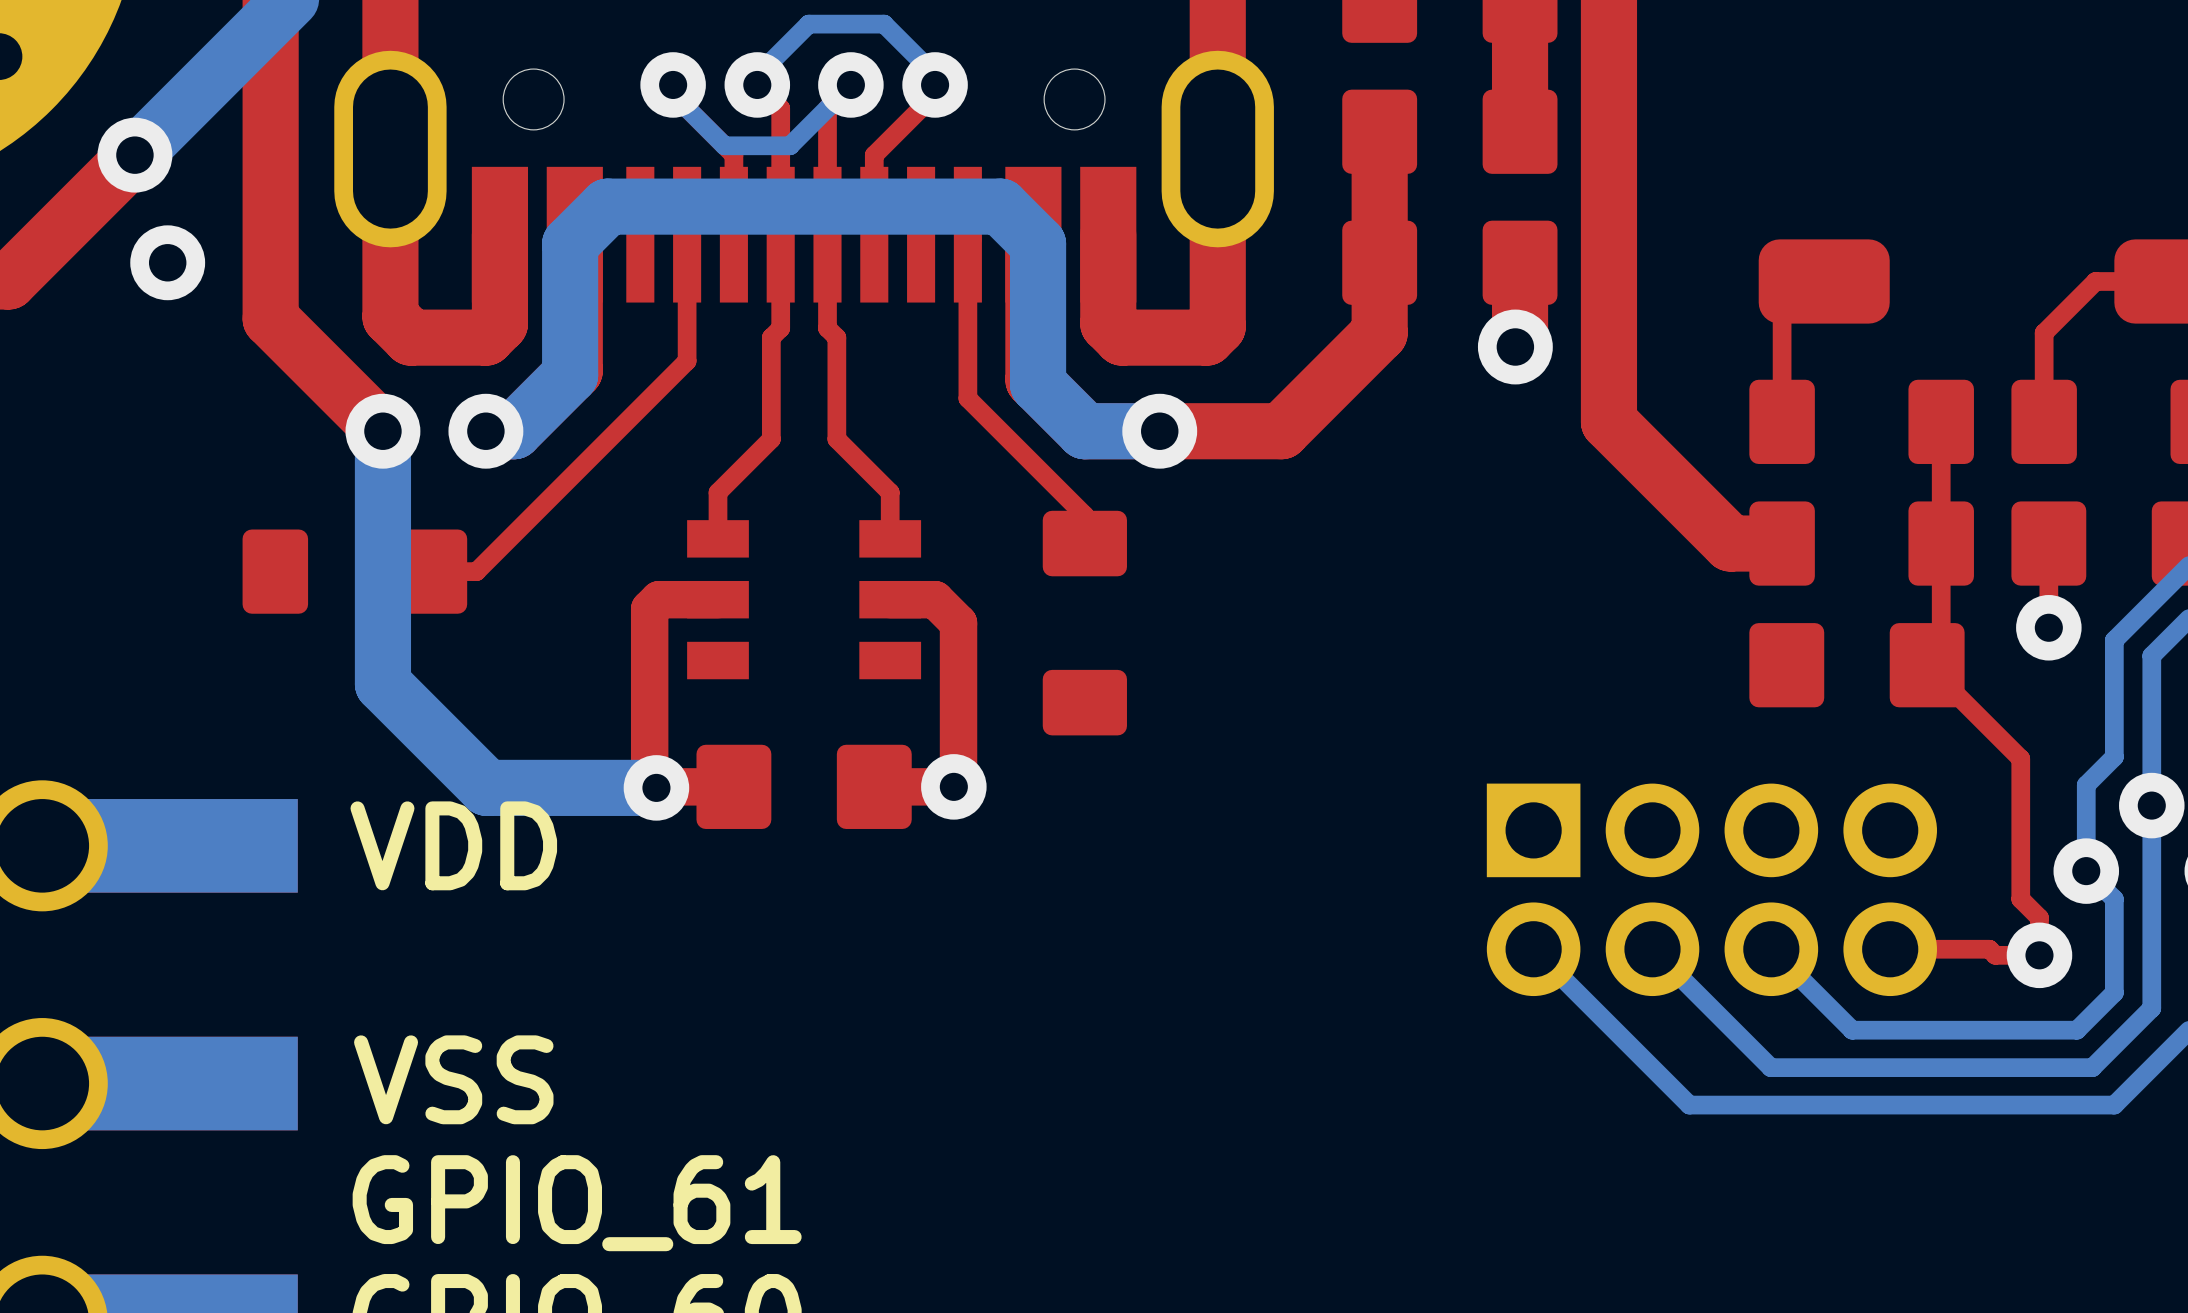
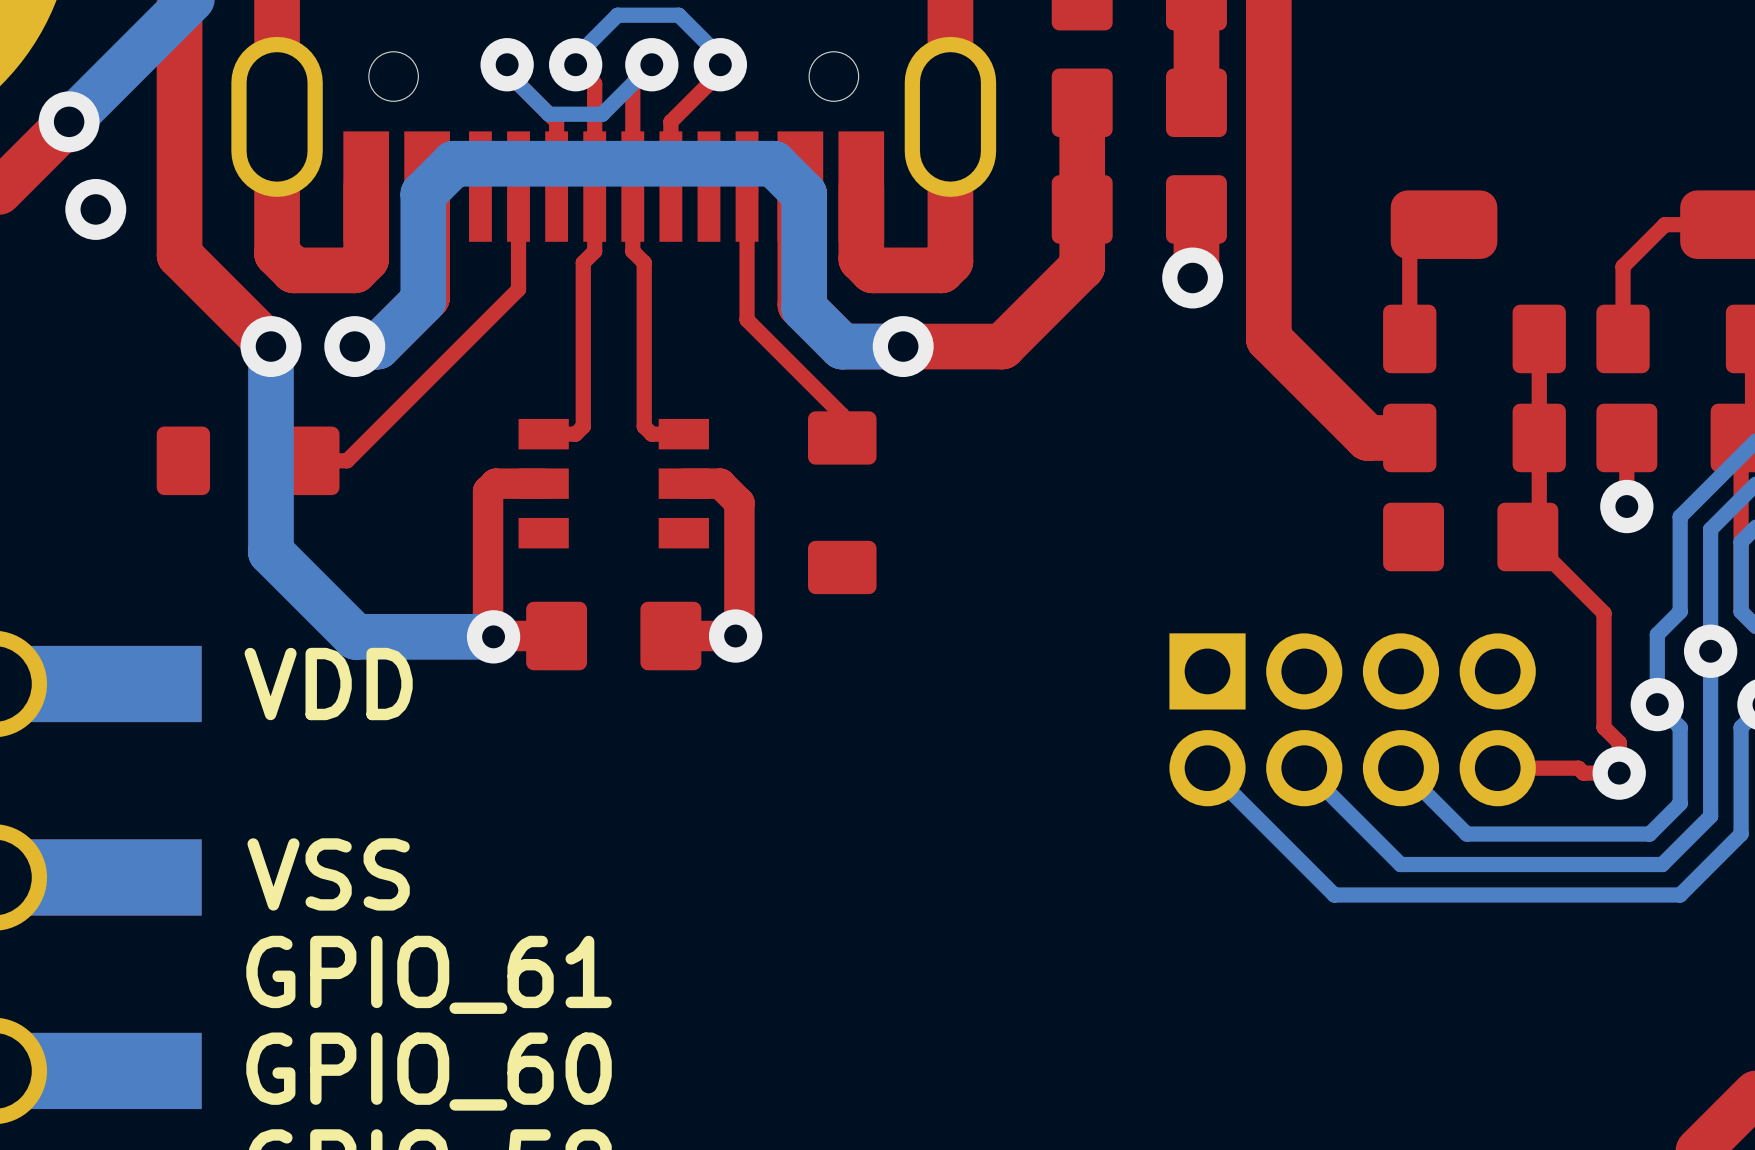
top track: (780, 314) (780, 328) (771, 337) (771, 439) (718, 492) (718, 538) -> (594, 251) (583, 262) (583, 426) (575, 434) (543, 434)
top track: (827, 314) (827, 328) (836, 337) (836, 439) (890, 492) (890, 538) -> (632, 251) (644, 262) (644, 426) (651, 434) (683, 434)

